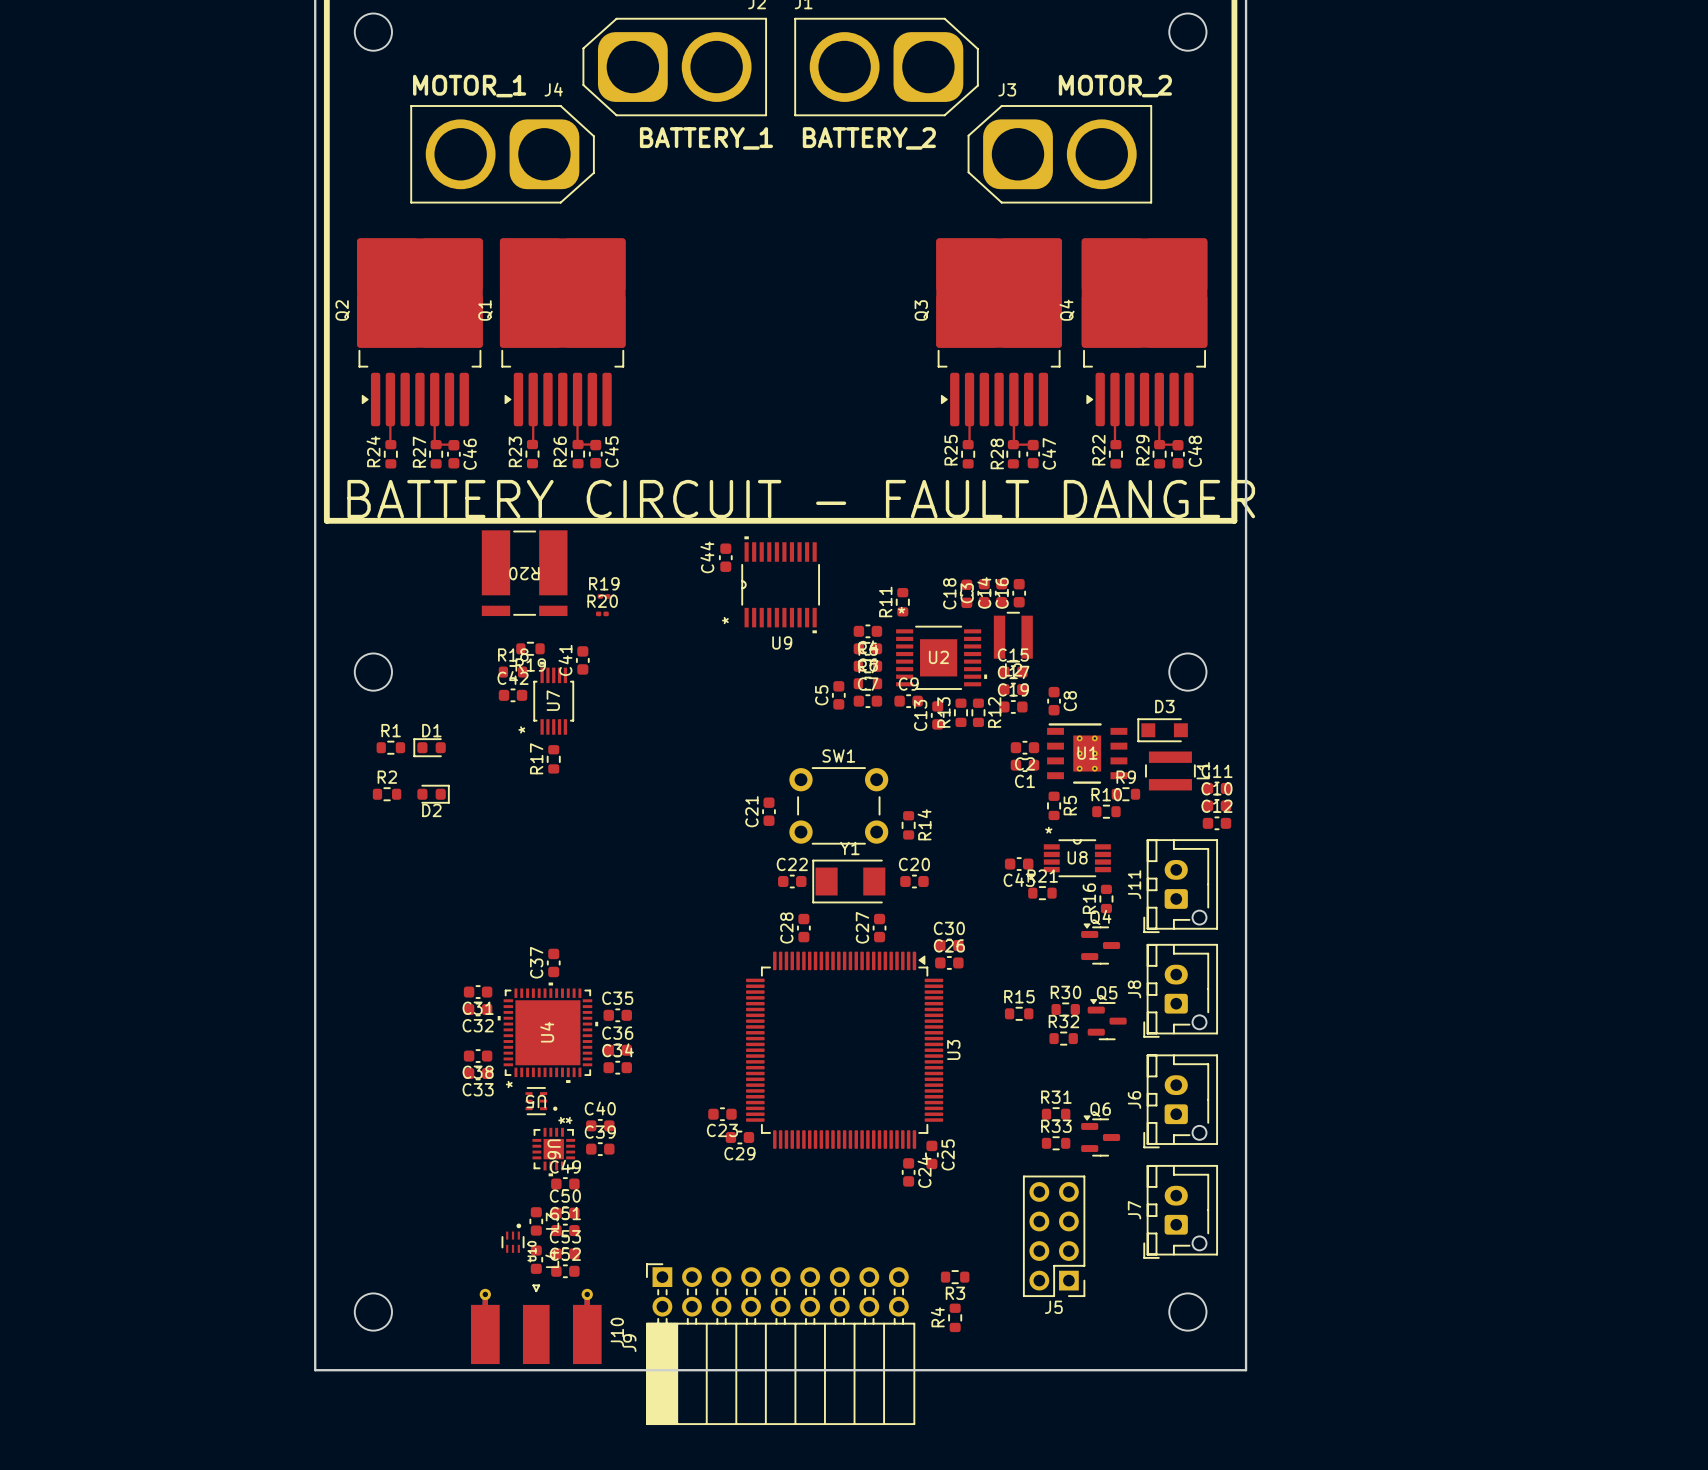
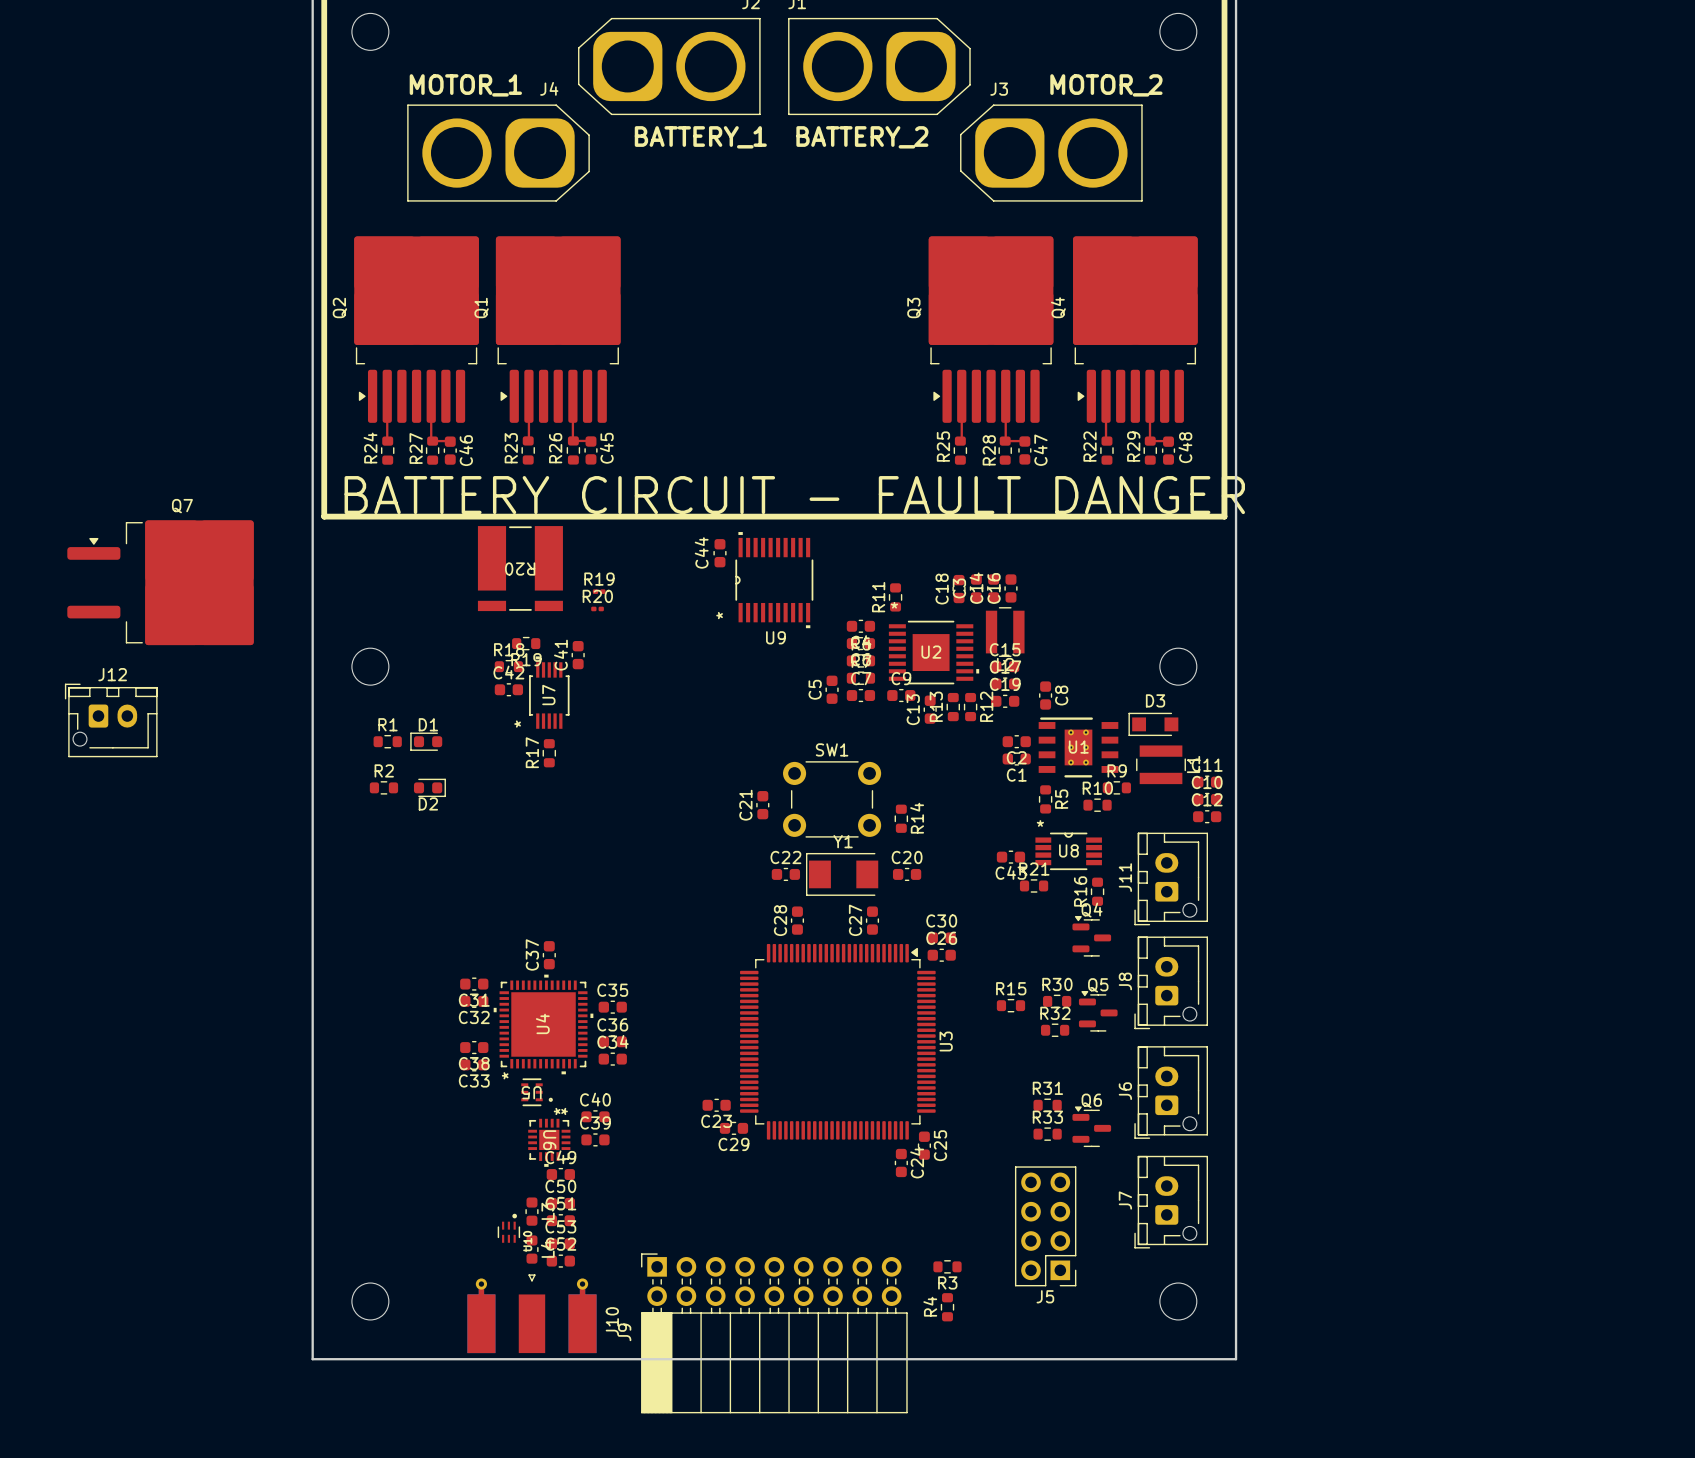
Q7: none -> (160, 582)
J12: none -> (111, 720)

